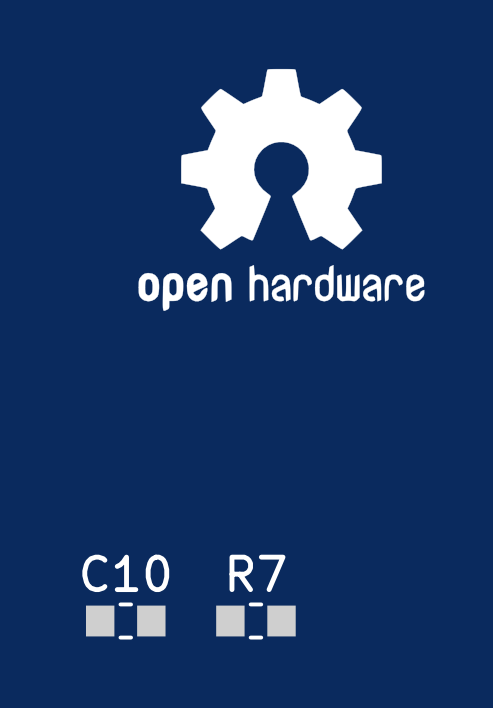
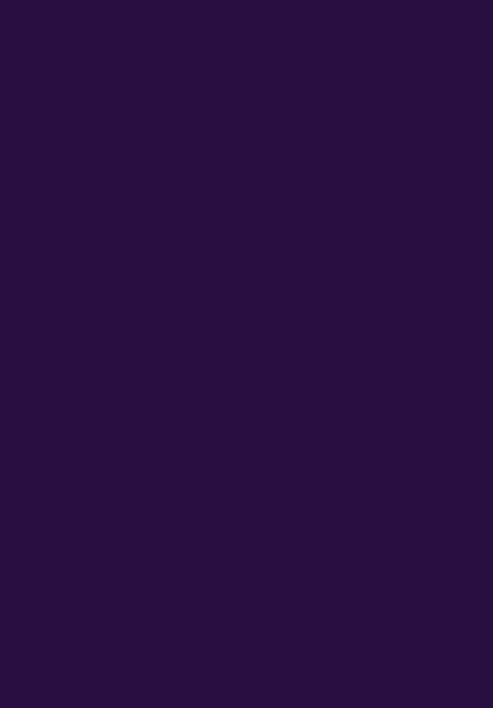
drawing: [138, 68, 425, 311] -> none
C10: (125, 621) -> none
R7: (255, 621) -> none

